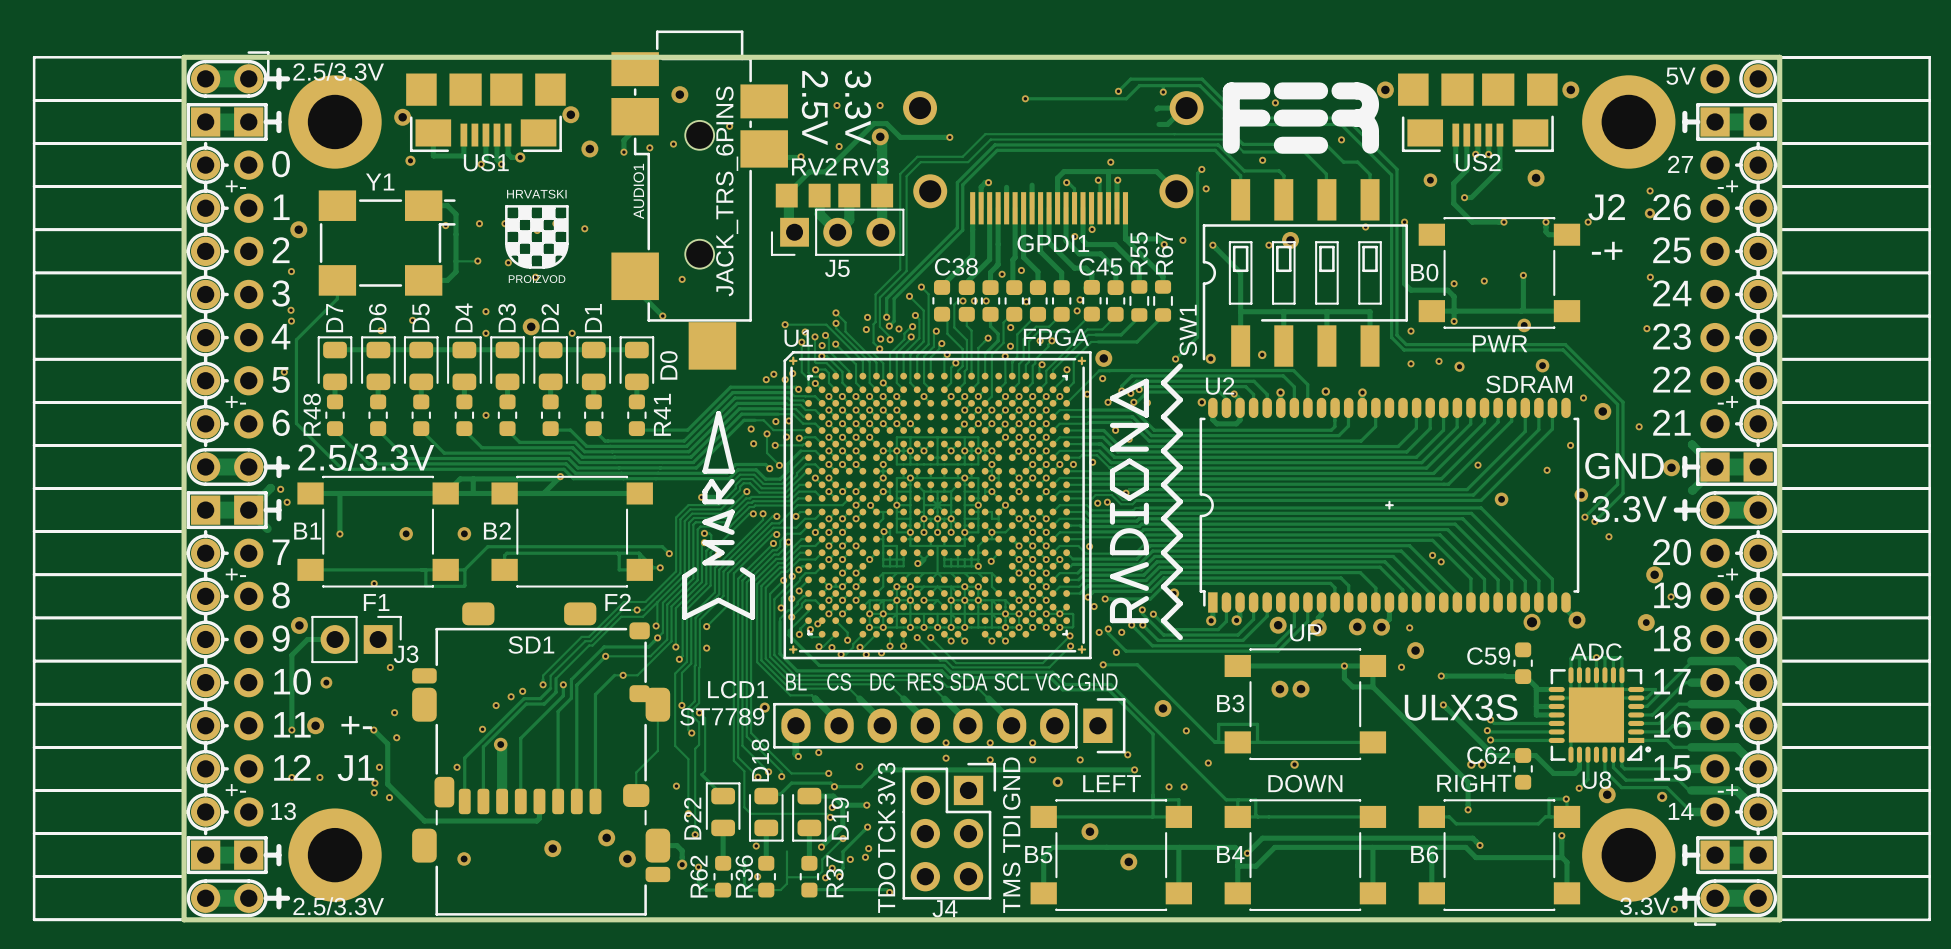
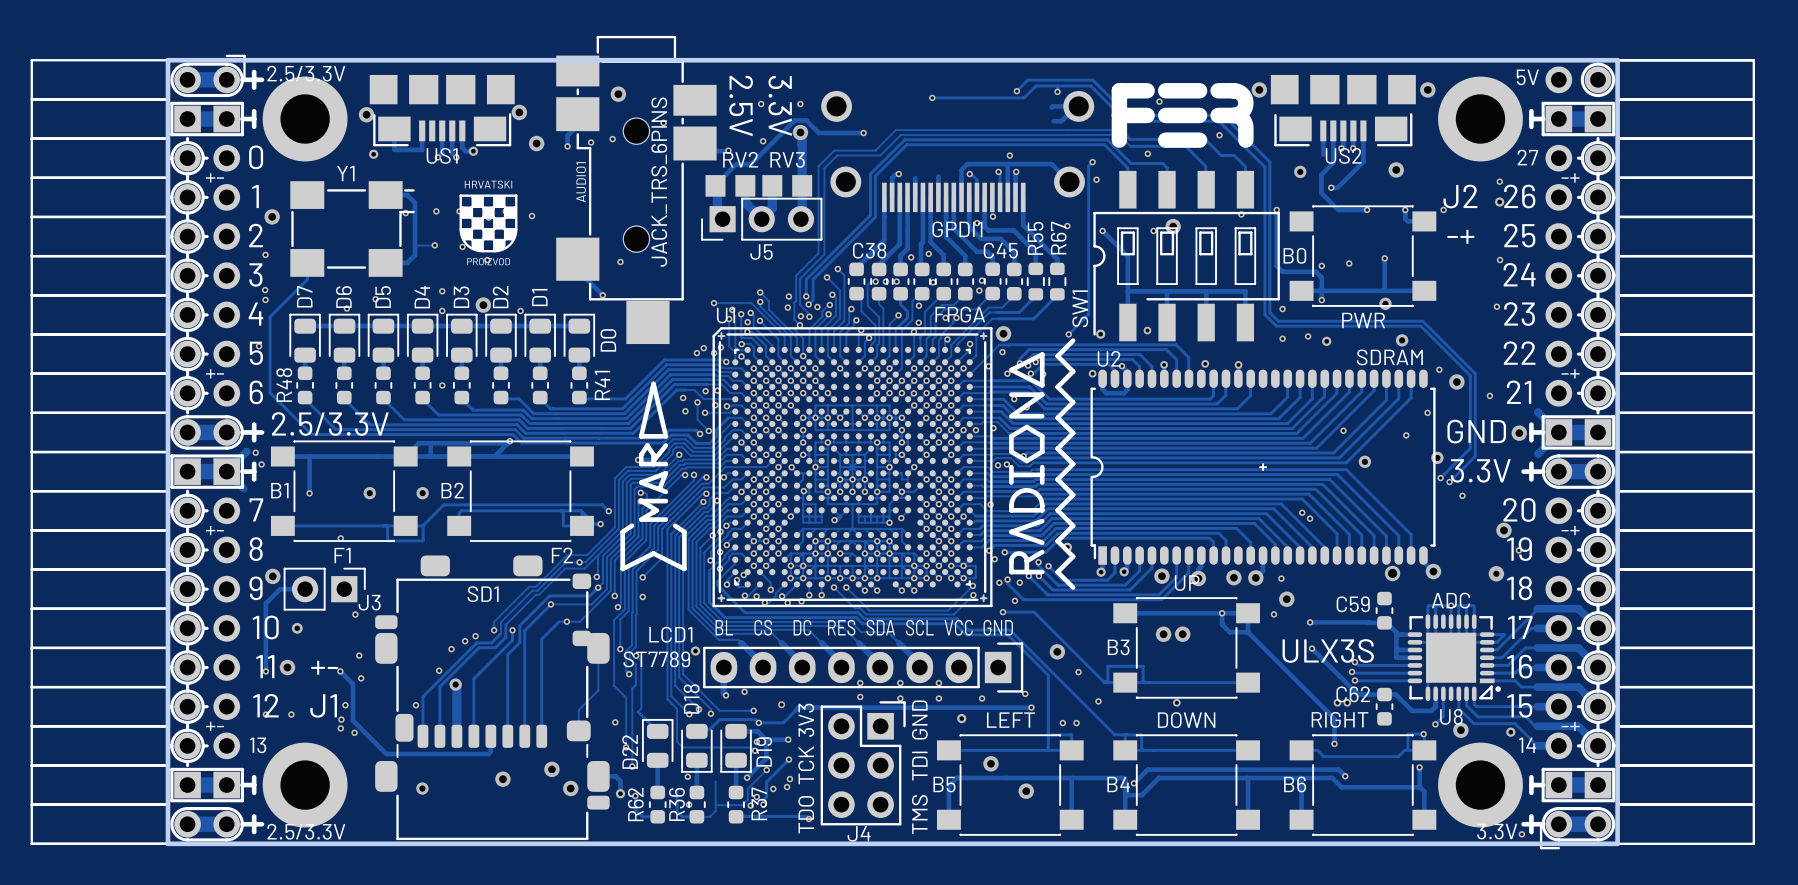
track: (1125, 238) (1158, 238) (1164, 244) -> none
via: none -> (1067, 226)
via: (1182, 240) -> none
via: (1164, 244) -> none

